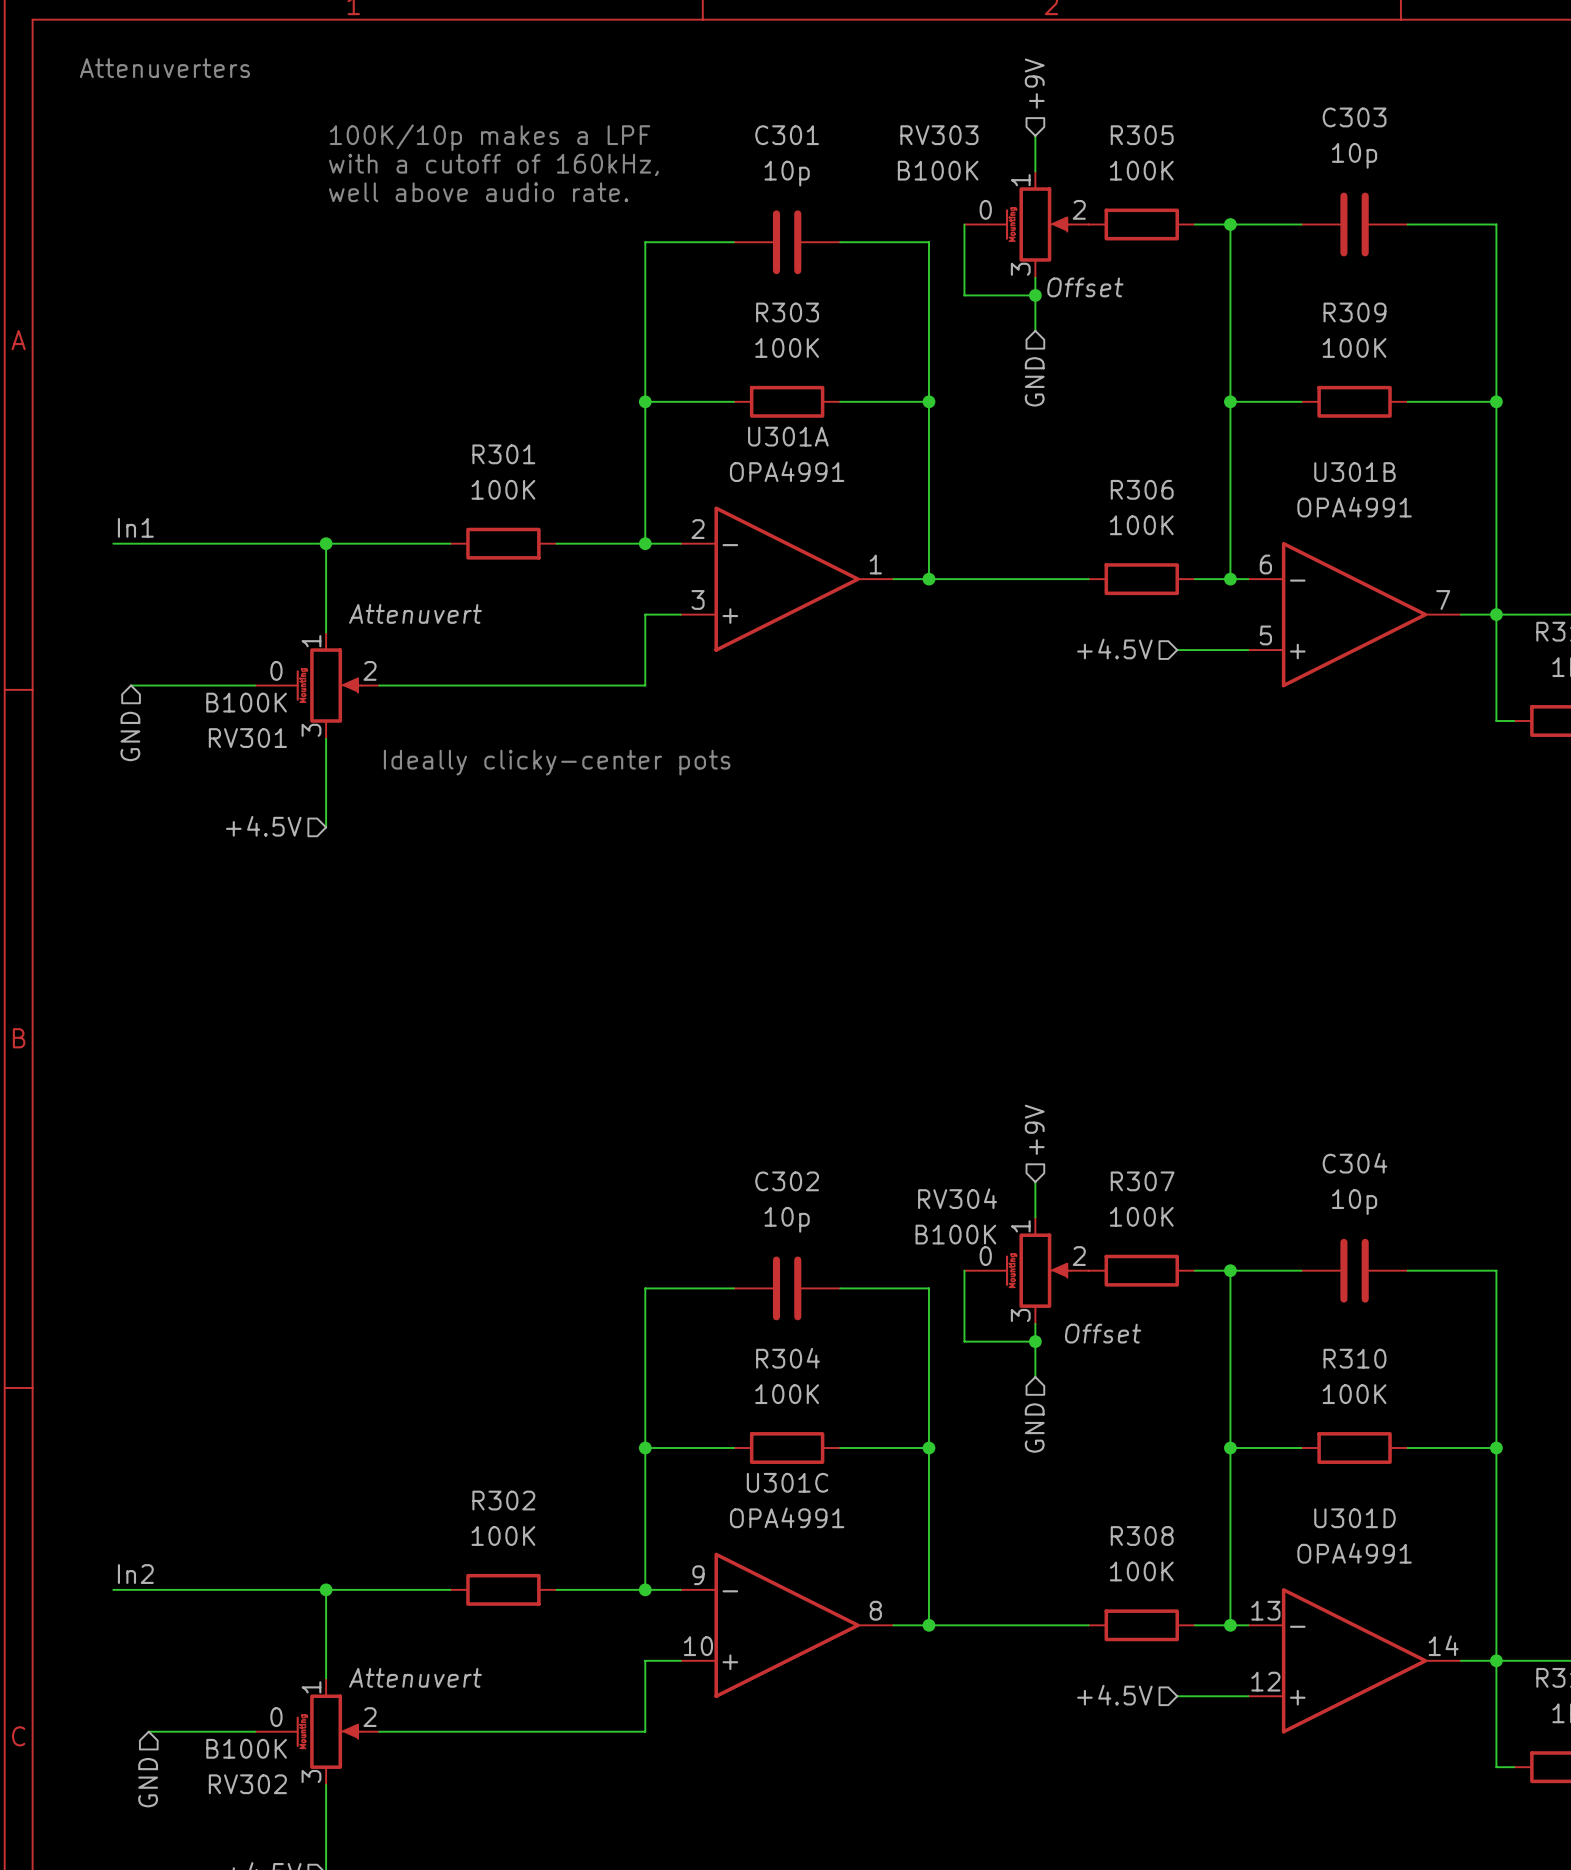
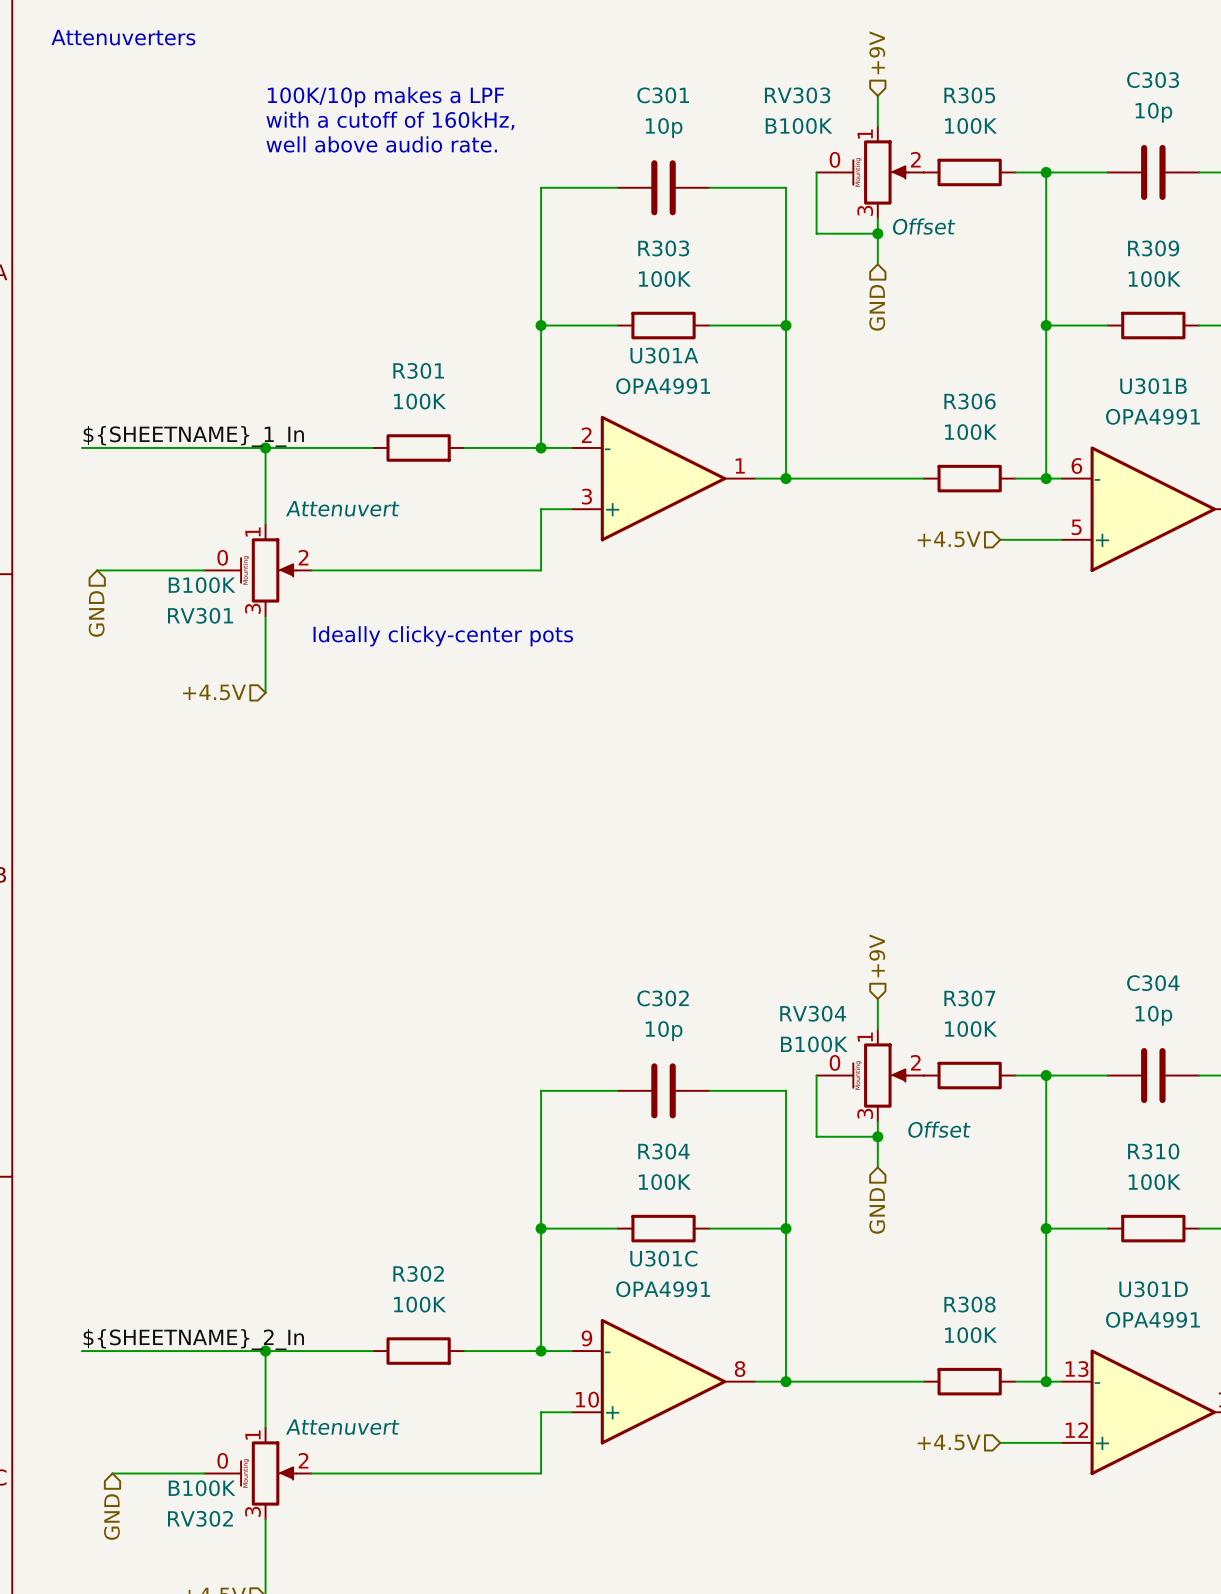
label: In1 (135, 527) -> ${SHEETNAME}_1_In (193, 436)
label: In2 (135, 1574) -> ${SHEETNAME}_2_In (193, 1339)

